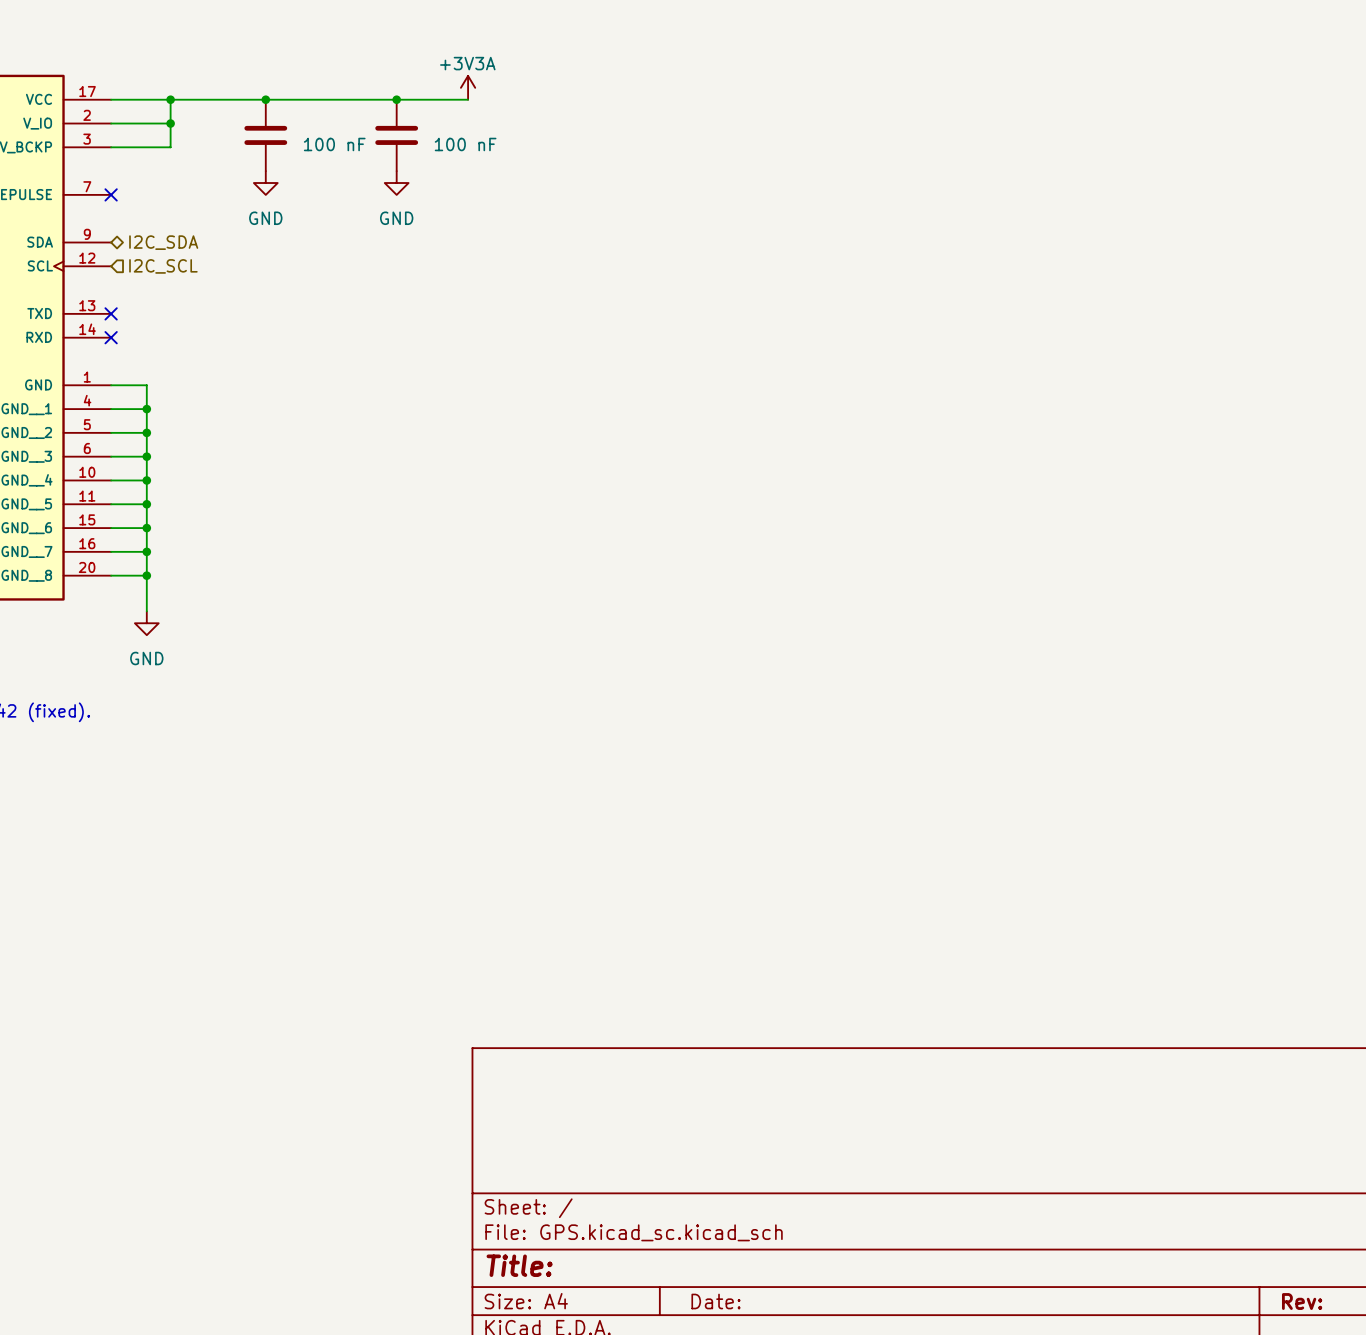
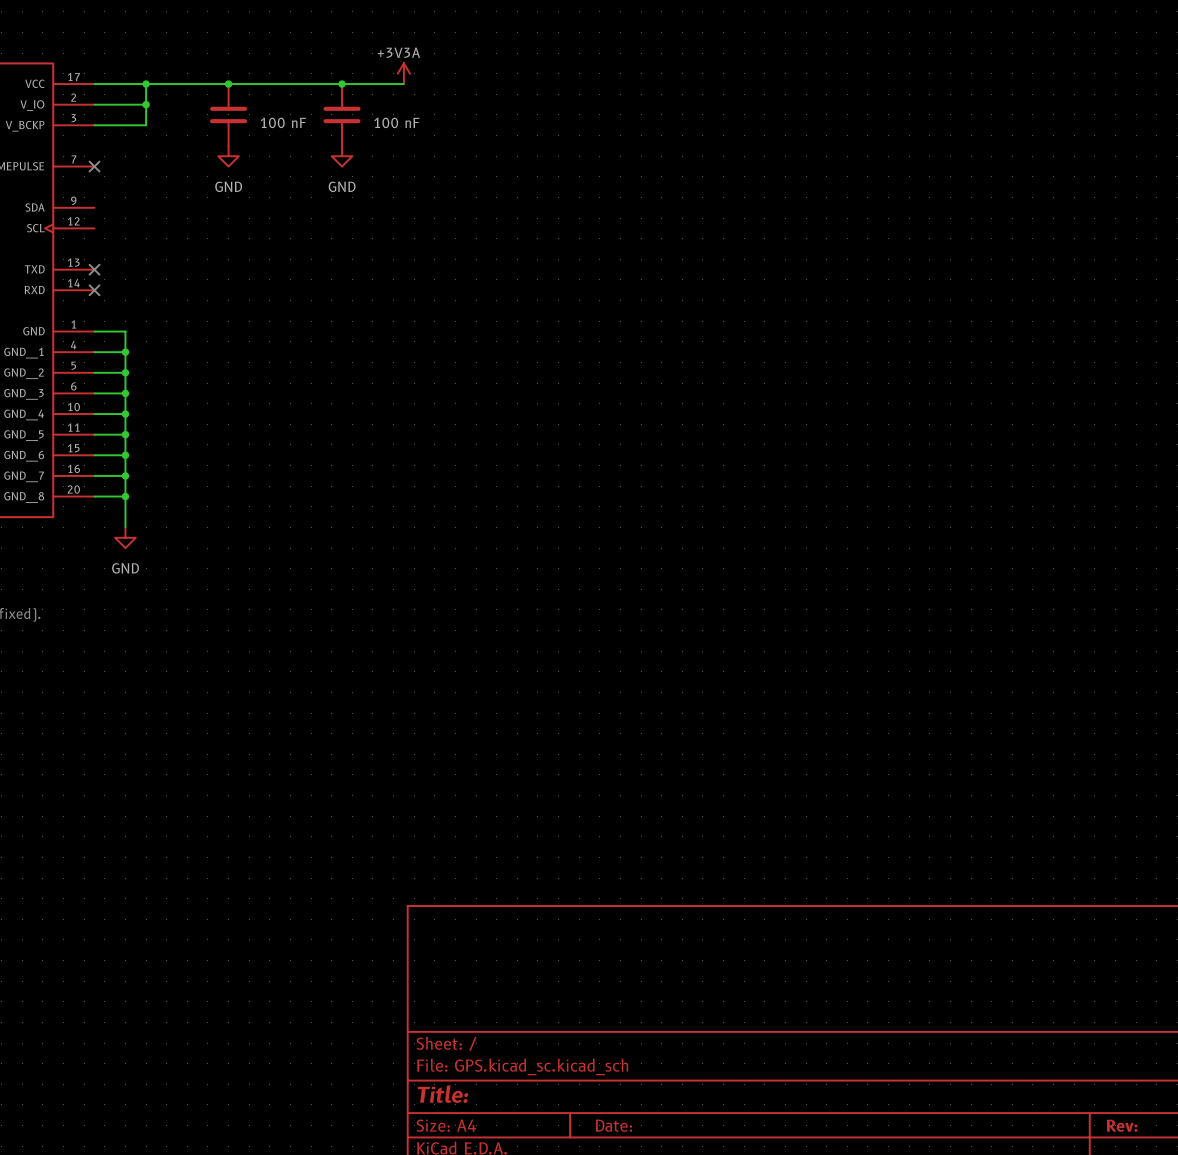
hierarchical label: I2C_SDA (163, 242) -> none
hierarchical label: I2C_SCL (163, 266) -> none

